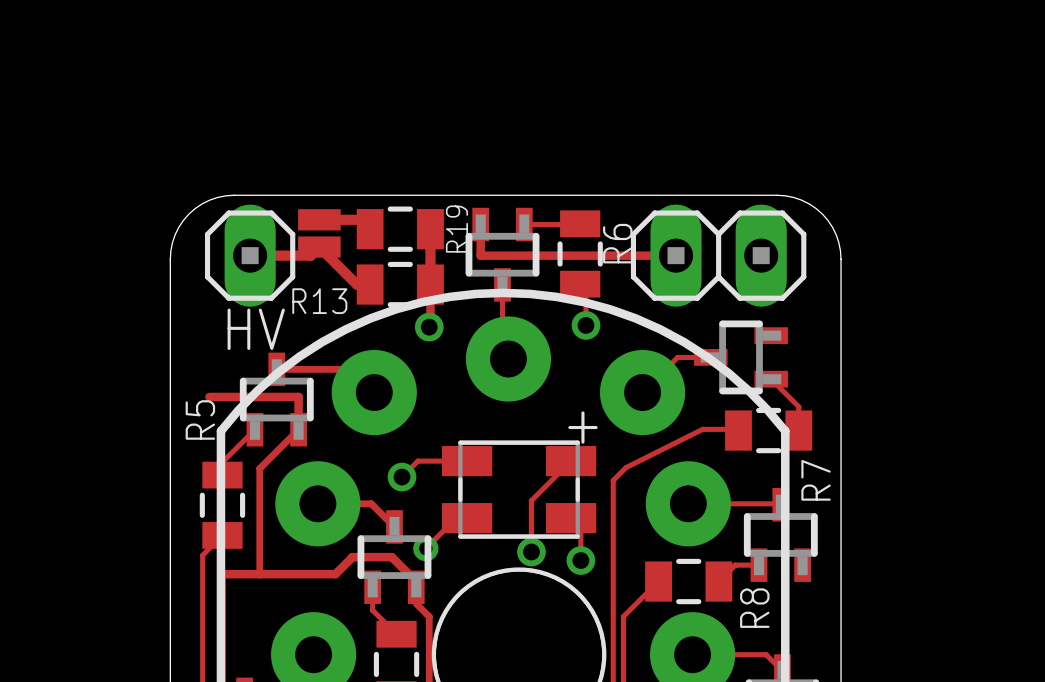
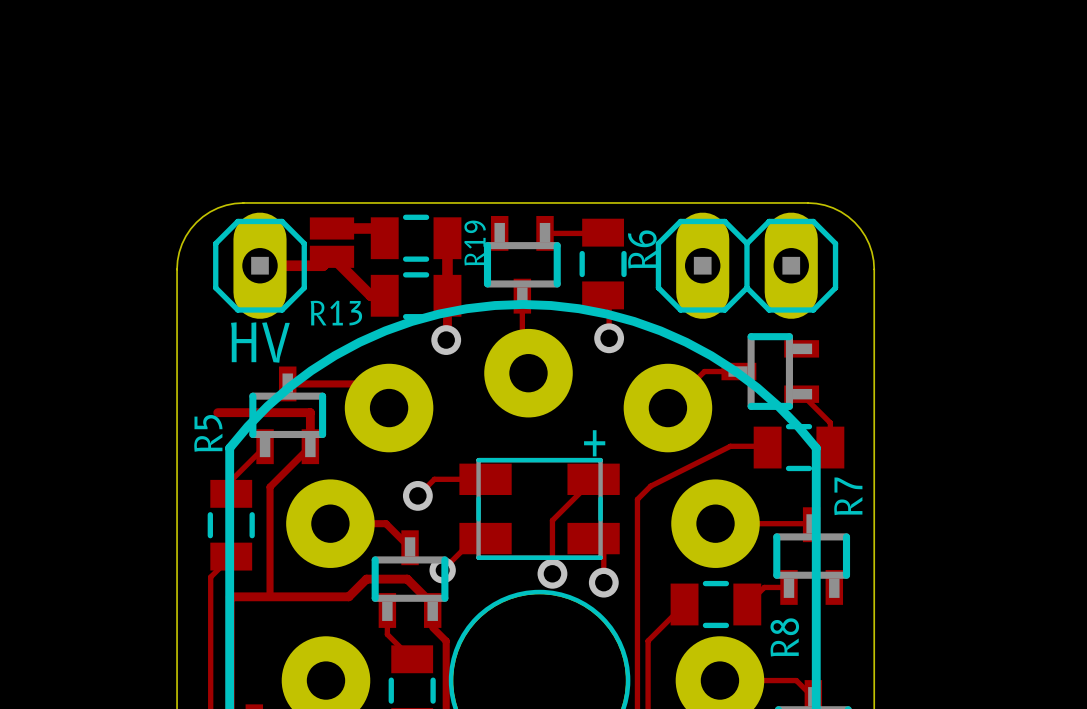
track: (480, 224) (480, 255) (676, 255) -> none

